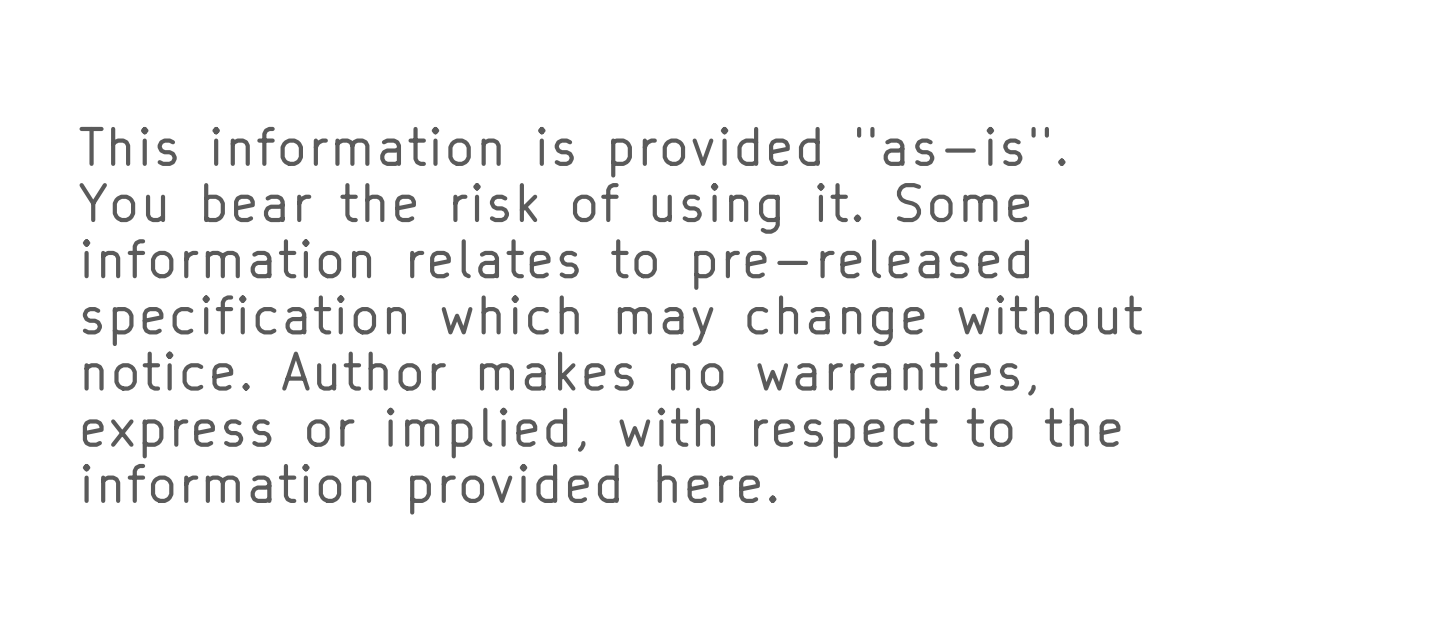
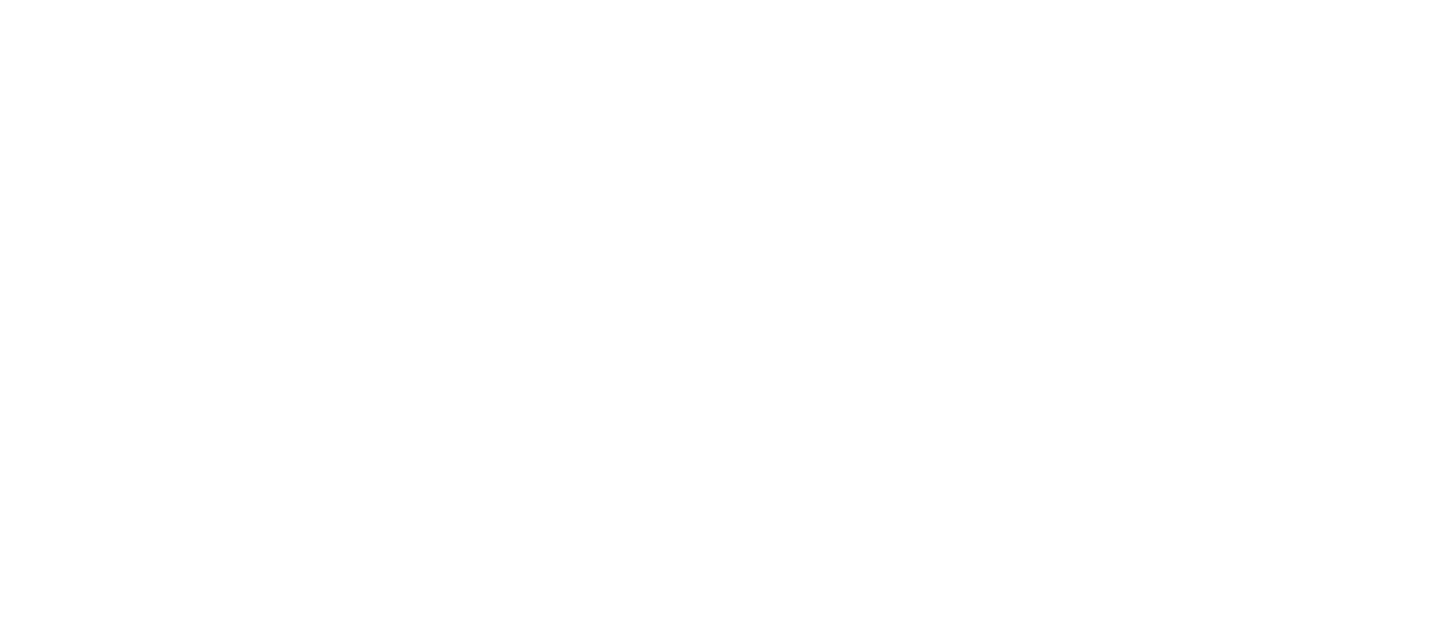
text: This information is provided "as-is". (572, 152) -> none
text: You bear the risk of using it. Some (554, 208) -> none
text: information relates to pre-released (555, 264) -> none
text: specification which may change without (612, 320) -> none
text: notice. Author makes no warranties, (560, 373) -> none
text: express or implied, with respect to the (601, 433) -> none
text: information provided here. (429, 489) -> none

